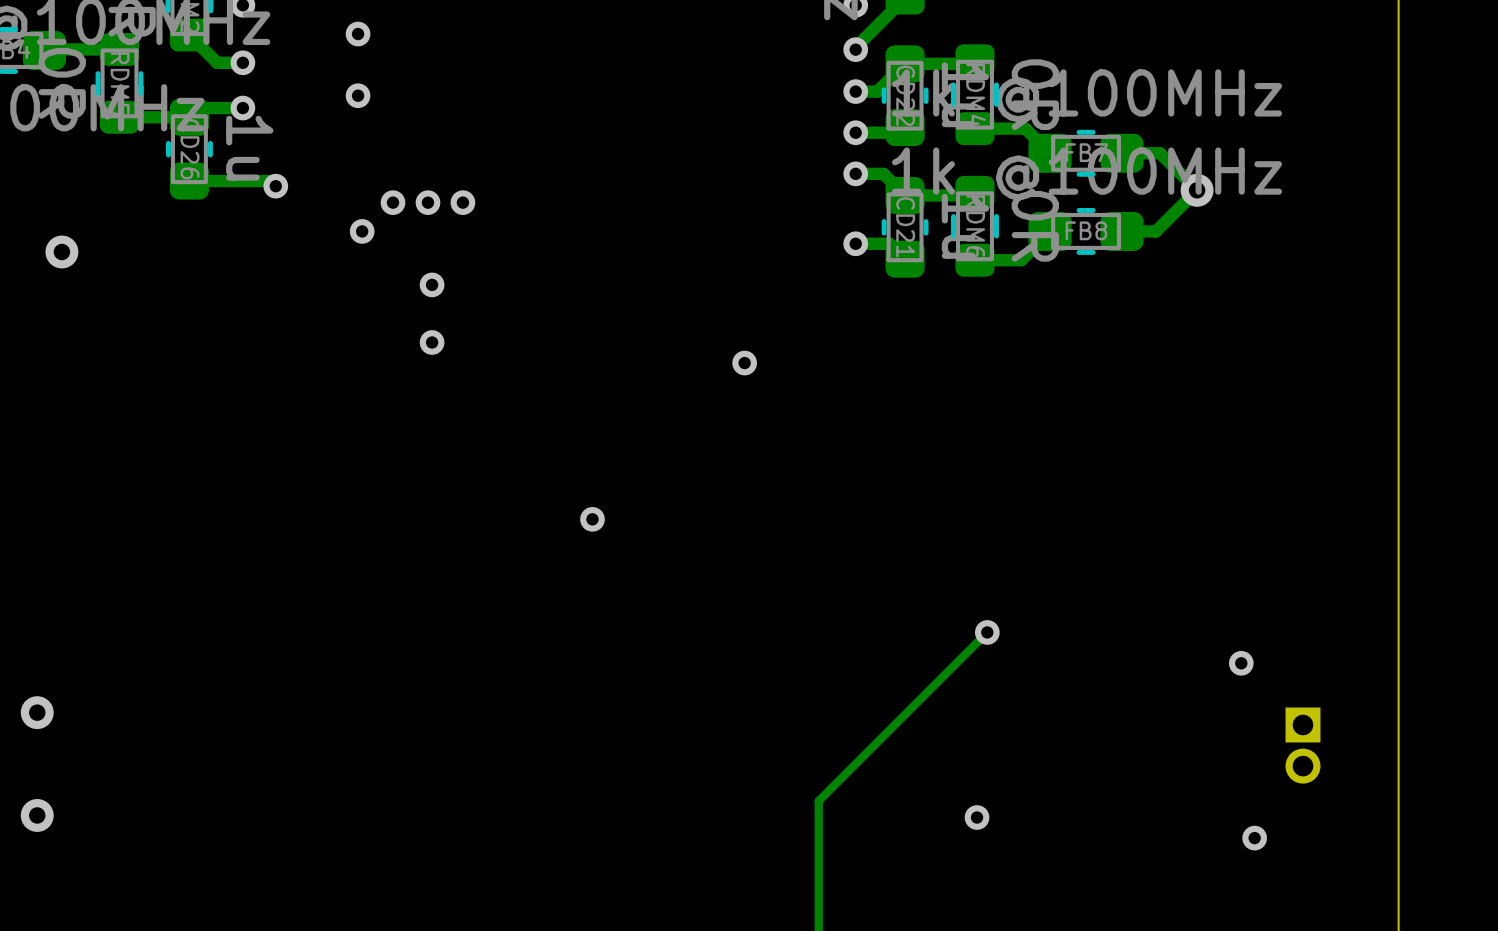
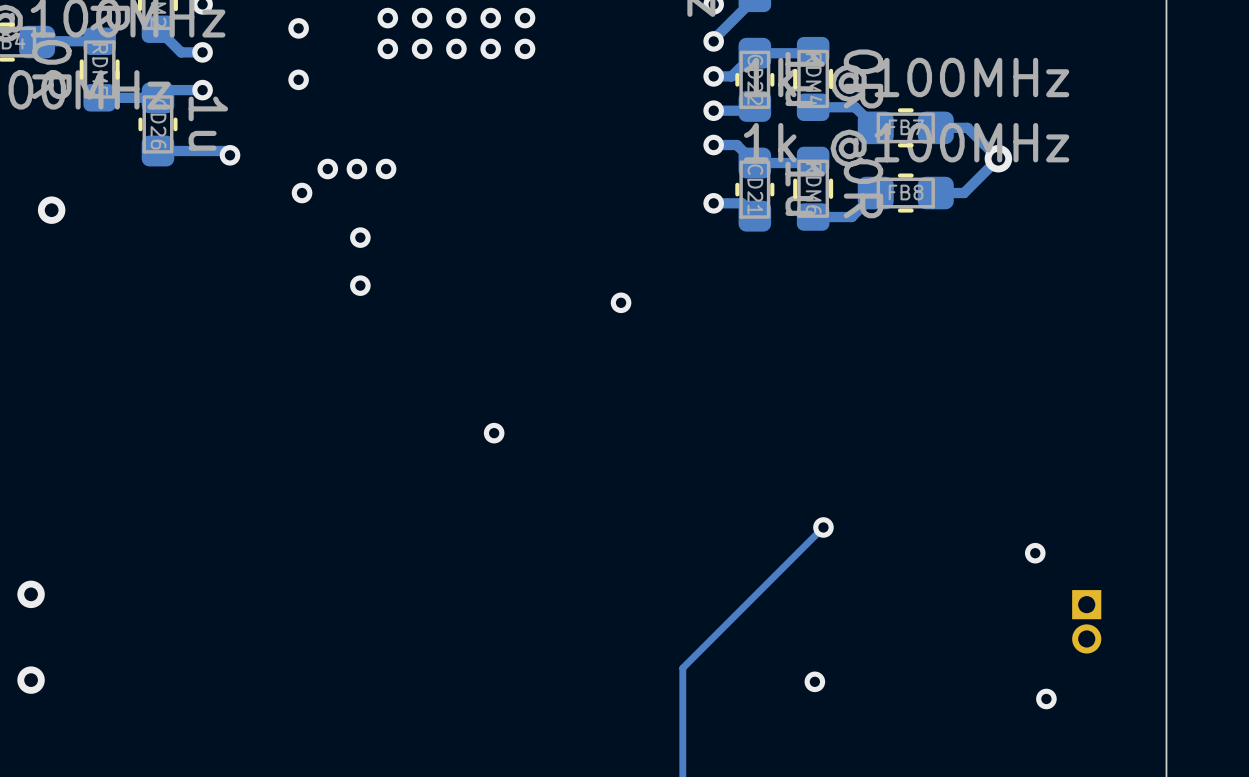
via: none -> (387, 18)
via: none -> (422, 18)
via: none -> (456, 18)
via: none -> (490, 18)
via: none -> (525, 18)
via: none -> (387, 48)
via: none -> (422, 48)
via: none -> (456, 48)
via: none -> (490, 48)
via: none -> (525, 48)

